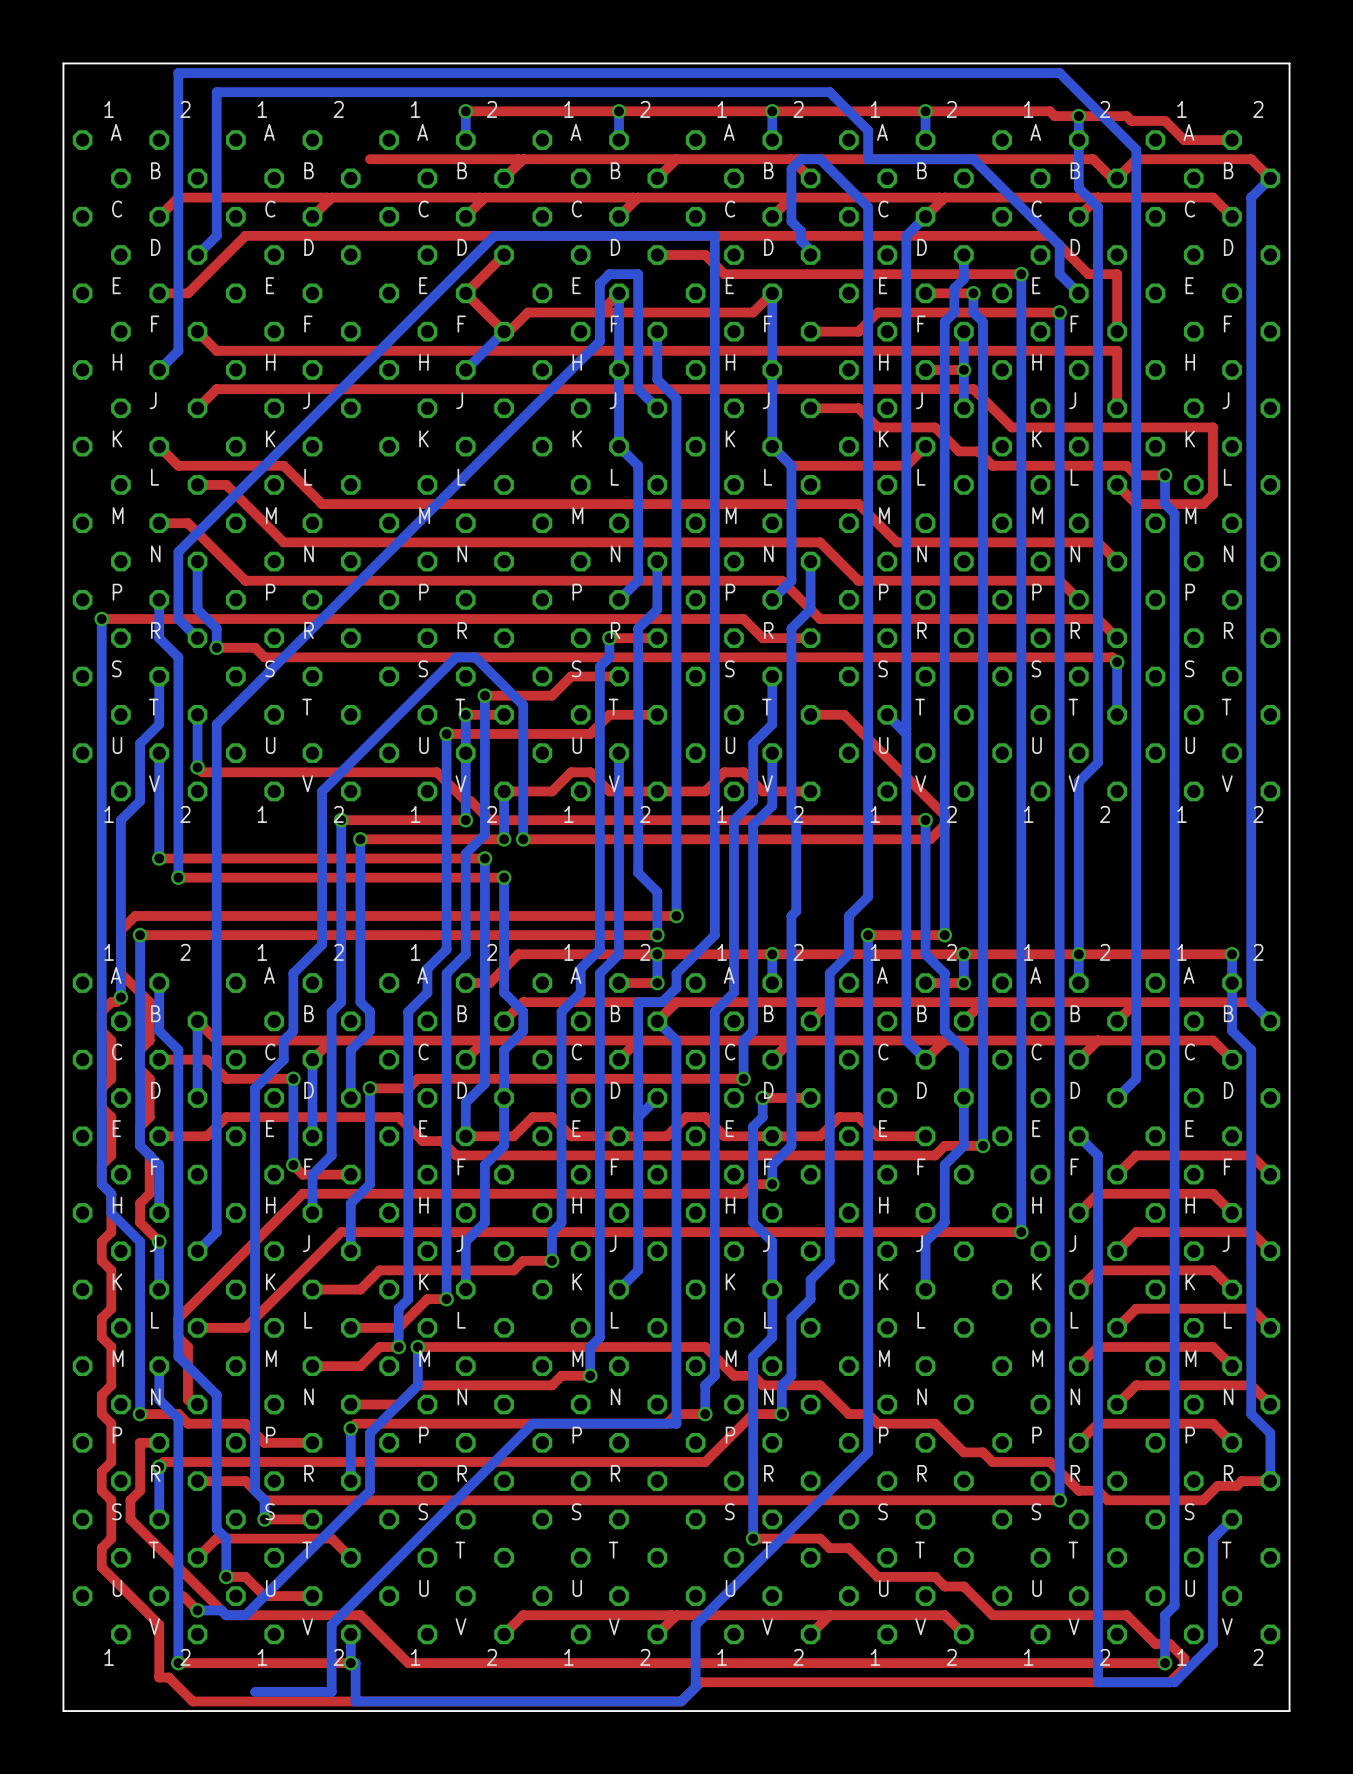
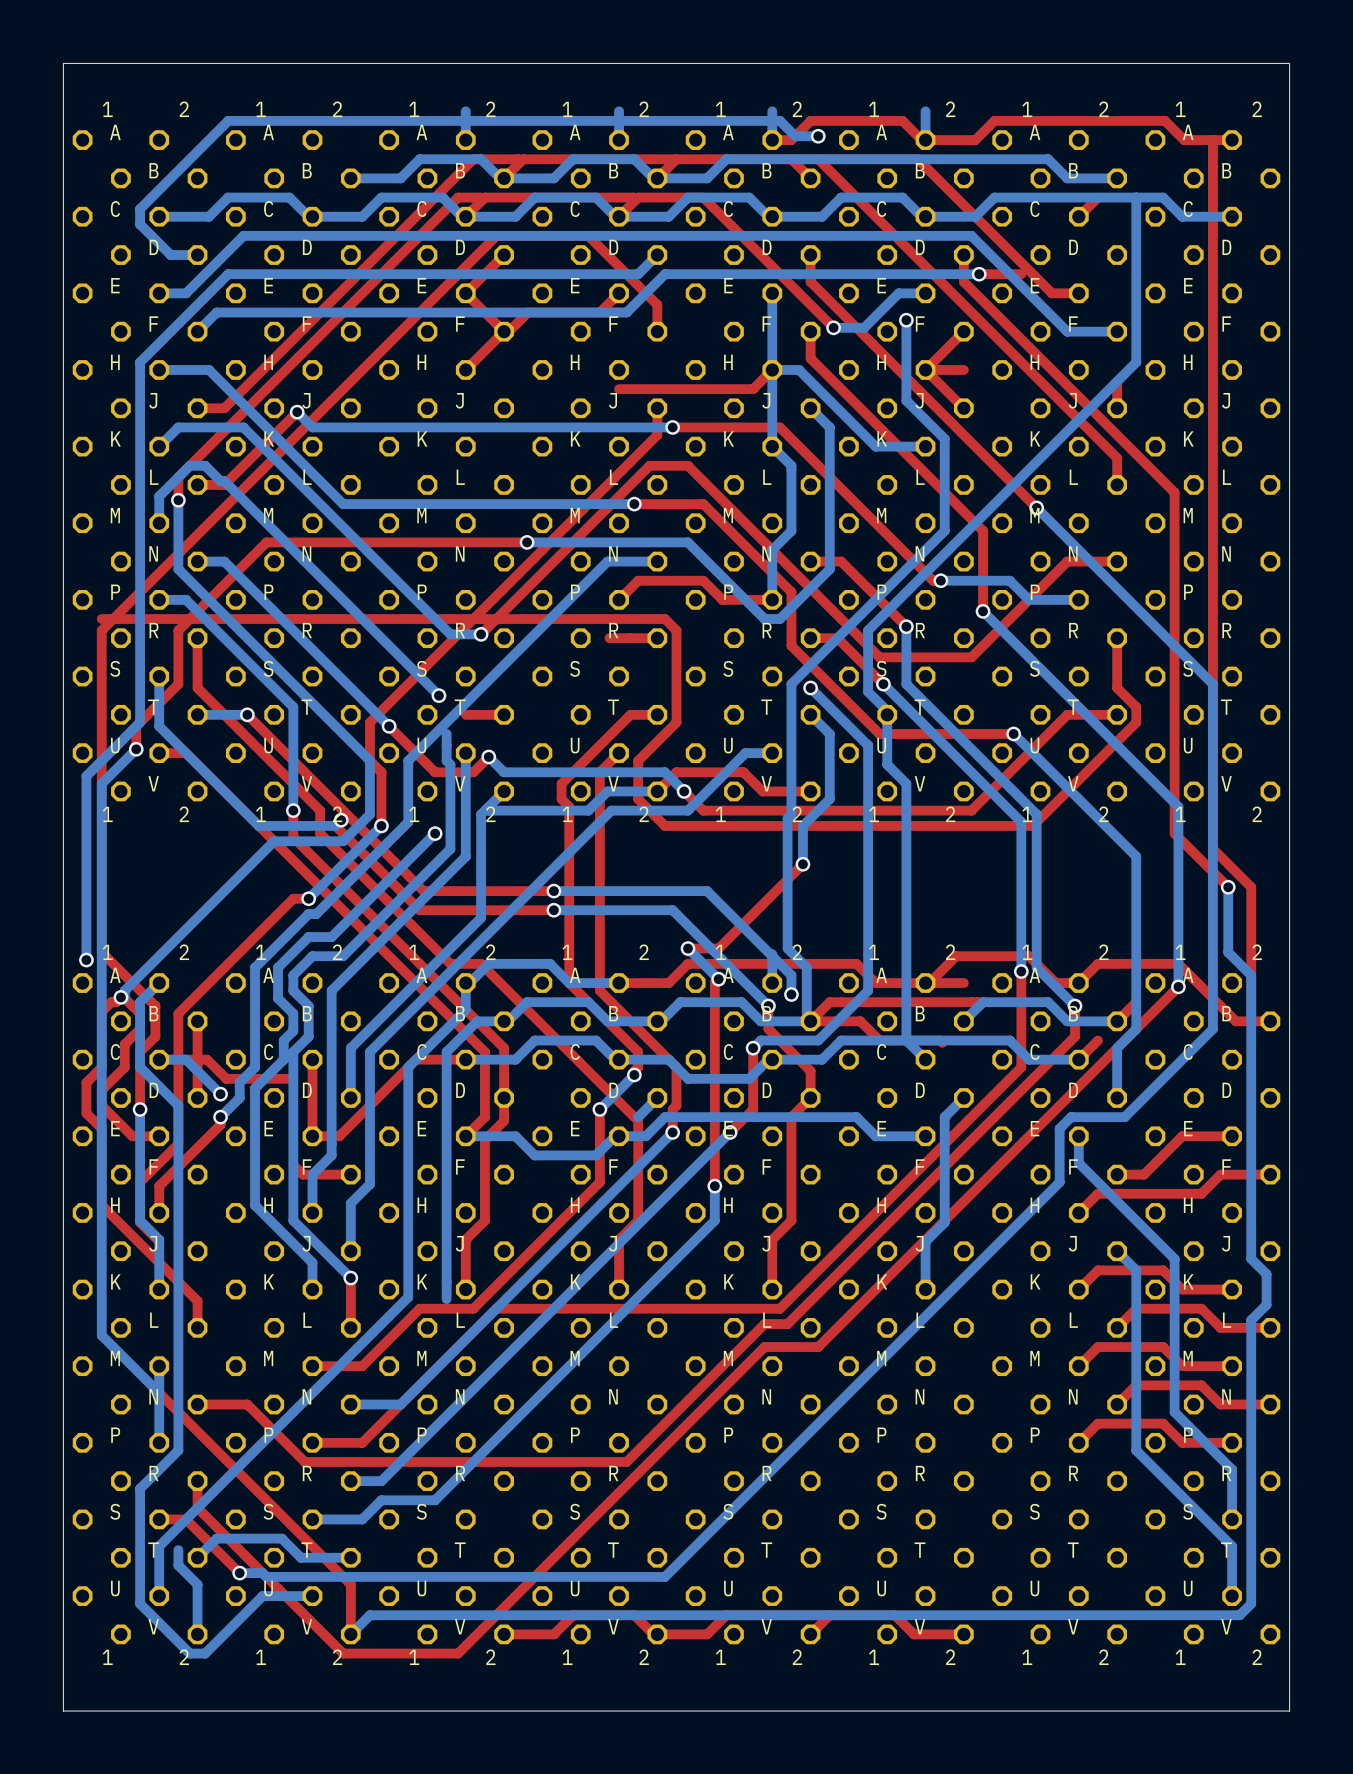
top track: (465, 111) (1050, 111) (1054, 116) (1126, 116) (1131, 120) -> (772, 140) (791, 140) (810, 120) (902, 120) (921, 140) (975, 140) (994, 120) (1131, 120)
via: (465, 111) -> none
via: (619, 111) -> none
via position: (772, 111) -> (818, 136)
via: (925, 111) -> none
bottom track: (1078, 116) (1078, 187) (1097, 207) (1097, 762) (1078, 781) (1078, 983) -> none
via: (1078, 116) -> none
top track: none -> (1212, 140) (1212, 427)
top track: (473, 159) (369, 159) -> none
bottom track: (801, 159) (791, 168) (791, 221) (801, 231) (801, 240) (810, 250) (810, 255) -> (801, 159) (726, 159) (707, 178) (653, 178) (634, 159) (573, 159) (553, 178) (500, 178) (481, 159) (419, 159) (400, 178) (350, 178)
bottom track: (820, 159) (868, 207) (868, 630) -> (820, 159) (868, 159)
bottom track: (868, 159) (868, 130) (829, 92) (216, 92) (216, 235) (197, 255) -> (818, 136) (795, 136) (779, 120) (228, 120) (140, 209) (140, 224) (170, 255) (197, 255)
top track: (917, 159) (1093, 159) (1112, 178) (1117, 178) (1136, 159) (1251, 159) (1270, 178) -> (917, 159) (1052, 293) (1078, 293)
bottom track: (973, 159) (1059, 245) (1059, 274) (1078, 293) -> (973, 159) (1048, 159) (1067, 178) (1117, 178)
bottom track: (1270, 178) (1251, 197) (1251, 975) -> (1228, 887) (1228, 952) (1251, 975)
top track: (458, 197) (331, 197) (312, 216) -> (458, 197) (178, 477) (178, 500)
top track: (703, 197) (786, 197) (789, 199) -> (703, 197) (833, 327)
bottom track: (1136, 197) (1136, 149) (1059, 73) (178, 73) (178, 350) (159, 369) -> (634, 504) (343, 504) (209, 369) (159, 369)
top track: (329, 199) (326, 197) (178, 197) (159, 216) -> none
top track: (942, 199) (939, 197) (791, 197) (772, 216) -> none
bottom track: (925, 216) (906, 235) (906, 320) -> none
top track: (1232, 216) (1212, 197) (944, 197) (925, 216) -> none
bottom track: none -> (1232, 216) (1182, 216) (1163, 197) (994, 197) (975, 216) (921, 216) (902, 197) (841, 197) (822, 216) (768, 216) (749, 197) (688, 197) (668, 216) (615, 216) (596, 197) (534, 197) (515, 216) (461, 216) (442, 197) (381, 197) (362, 216) (308, 216) (289, 197) (228, 197) (209, 216) (159, 216)
bottom track: (494, 235) (178, 551) -> (494, 235) (243, 235) (186, 293) (159, 293)
top track: (496, 235) (245, 235) (187, 293) (159, 293) -> none
top track: (588, 235) (1050, 235) (1088, 274) (1117, 274) (1117, 331) -> (588, 235) (657, 304) (657, 331)
bottom track: (714, 235) (714, 935) (676, 973) (676, 987) (662, 1002) (638, 1002) (638, 1270) (619, 1289) -> (714, 235) (971, 235) (1067, 331) (1117, 331)
top track: (657, 255) (705, 255) (724, 274) (979, 274) -> none
top track: none -> (810, 255) (810, 281) (1036, 507)
top track: none -> (963, 255) (963, 281) (1174, 492) (1174, 833) (1228, 887)
bottom track: (963, 255) (963, 278) (954, 288) (954, 312) (944, 322) (944, 438) -> (906, 400) (944, 438)
bottom track: (609, 274) (599, 283) (599, 341) (216, 724) (216, 1232) (197, 1251) -> (609, 274) (228, 274) (140, 362) (140, 722) (86, 776) (86, 960)
bottom track: (638, 274) (638, 389) (657, 408) -> (638, 274) (657, 255)
bottom track: none -> (979, 274) (665, 274) (626, 312) (216, 312) (197, 331)
bottom track: (1021, 274) (1021, 822) -> (883, 684) (1021, 822)
via: (1021, 274) -> none
bottom track: (619, 293) (619, 446) (638, 465) (638, 580) (619, 599) -> none
top track: (772, 293) (753, 312) (619, 312) -> none
bottom track: none -> (925, 293) (898, 293) (864, 327) (833, 327)
top track: (973, 293) (925, 293) -> none
bottom track: (973, 293) (973, 312) (983, 322) (983, 1145) -> none
via position: (973, 293) -> (979, 274)
top track: (1059, 312) (877, 312) (858, 331) (810, 331) -> (983, 611) (983, 530) (810, 358) (810, 331)
bottom track: (1059, 312) (1059, 1128) -> (1036, 507) (1212, 684) (1212, 1029) (1124, 1117) (1071, 1117) (1059, 1128)
via: (1059, 312) -> none
via: none -> (906, 320)
via: none -> (833, 327)
top track: (197, 331) (216, 350) (1117, 350) (1117, 381) -> none
top track: none -> (504, 331) (465, 369)
bottom track: (504, 331) (465, 369) -> none
bottom track: (657, 331) (657, 379) (676, 398) (676, 915) -> none
top track: none -> (963, 331) (925, 369) (963, 408)
bottom track: (963, 331) (963, 408) -> none
bottom track: (1136, 362) (1136, 856) -> (1136, 362) (868, 630)
bottom track: none -> (772, 369) (799, 369) (875, 446) (925, 446)
via: (963, 369) -> none
top track: (619, 389) (216, 389) (197, 408) -> (473, 159) (224, 408) (197, 408)
top track: (753, 389) (973, 389) (1011, 427) (1212, 427) -> (753, 389) (772, 369)
bottom track: (906, 400) (906, 626) -> none
top track: none -> (657, 408) (657, 435) (369, 722) (369, 760) (381, 772) (381, 825)
top track: (810, 408) (858, 408) (877, 427) (935, 427) (959, 451) (978, 451) (992, 465) (1126, 465) (1136, 475) (1165, 475) -> none
bottom track: none -> (810, 408) (829, 427) (829, 569) (779, 619) (764, 619) (688, 542) (527, 542)
bottom track: none -> (297, 412) (312, 427) (672, 427)
via: none -> (297, 412)
via: none -> (672, 427)
top track: (159, 446) (178, 465) (283, 465) (322, 504) (634, 504) -> none
bottom track: none -> (159, 446) (178, 427) (243, 427) (450, 634) (481, 634)
top track: (925, 446) (906, 465) (791, 465) (772, 446) -> none
bottom track: (1165, 475) (1165, 504) (1174, 513) (1174, 1258) -> none
via: (1165, 475) -> none
top track: (224, 484) (283, 542) -> (224, 484) (297, 412)
top track: (1117, 484) (1136, 504) (1203, 504) (1212, 494) -> (1117, 484) (1117, 458) (818, 159)
top track: none -> (1212, 494) (1212, 848) (1251, 887) (1251, 1021)
bottom track: none -> (178, 500) (178, 551)
via: none -> (178, 500)
via: none -> (634, 504)
top track: (703, 504) (858, 504) (896, 542) (1097, 542) (1117, 561) -> (703, 504) (791, 592) (791, 645) (879, 733) (1013, 733)
via: none -> (1036, 507)
top track: (159, 523) (187, 523) (245, 580) (638, 580) -> (619, 599) (638, 580)
bottom track: none -> (159, 523) (159, 496) (189, 465) (205, 465) (220, 481) (224, 481) (438, 695)
bottom track: (791, 530) (791, 580) (772, 599) -> (791, 530) (772, 550) (772, 599)
bottom track: (944, 530) (944, 935) -> none
top track: none -> (283, 542) (266, 542) (178, 630) (178, 684) (136, 726) (136, 749)
top track: (527, 542) (820, 542) (858, 580) (933, 580) -> (672, 427) (779, 427) (933, 580)
via: none -> (527, 542)
bottom track: (197, 561) (197, 609) (216, 628) (216, 647) -> (197, 561) (224, 561) (389, 726)
bottom track: (657, 561) (657, 609) (638, 628) (638, 872) (657, 892) (657, 935) -> (657, 561) (607, 561) (408, 760) (408, 822) (316, 914) (308, 914) (255, 967) (255, 1067) (239, 1082) (239, 1097) (220, 1117)
top track: none -> (810, 561) (841, 561) (906, 626)
bottom track: (810, 561) (810, 609) (791, 628) (791, 684) -> (944, 530) (791, 684)
bottom track: (178, 569) (178, 619) (197, 638) -> (178, 569) (369, 760) (369, 814) (343, 841) (274, 841) (124, 990) (124, 998)
top track: (703, 580) (781, 580) (820, 619) (1097, 619) (1117, 638) -> (665, 619) (676, 630) (676, 722) (638, 760) (638, 799) (665, 825) (1032, 825) (1136, 722) (1136, 707) (1117, 688) (1117, 638)
top track: none -> (703, 580) (722, 599) (772, 599)
top track: (940, 580) (1059, 580) (1078, 599) -> none
bottom track: none -> (940, 580) (1009, 580) (1029, 599) (1078, 599)
via: none -> (940, 580)
bottom track: (159, 599) (159, 638) (178, 657) (178, 877) -> (159, 599) (186, 599) (293, 707) (293, 810)
bottom track: none -> (983, 611) (1178, 806) (1178, 986)
via: none -> (983, 611)
bottom track: (101, 619) (101, 783) -> (136, 749) (101, 783)
via: (101, 619) -> none
top track: (665, 619) (743, 619) (762, 638) (810, 638) -> (883, 684) (837, 638) (810, 638)
via: none -> (906, 626)
via: none -> (481, 634)
top track: none -> (197, 638) (197, 688) (320, 810) (320, 833) (450, 963) (481, 963) (634, 1117) (638, 1117) (638, 1220) (619, 1239) (619, 1289)
bottom track: (609, 638) (609, 657) (599, 666) (599, 949) (580, 968) (580, 992) (561, 1011) (561, 1222) (551, 1232) (551, 1260) -> none
via: (609, 638) -> none
top track: (216, 647) (255, 647) (264, 657) (879, 657) -> (481, 634) (649, 465) (688, 465) (879, 657)
via: (216, 647) -> none
top track: (971, 657) (1112, 657) (1117, 662) -> (971, 657) (1067, 561) (1117, 561)
bottom track: (1117, 662) (1117, 714) -> none
via: (1117, 662) -> none
top track: (619, 676) (571, 676) (551, 695) (484, 695) -> none
bottom track: (772, 676) (772, 724) (753, 743) (753, 801) (733, 820) (733, 992) (714, 1011) (714, 1186) -> none
via: none -> (883, 684)
bottom track: (906, 684) (906, 729) (904, 731) -> (906, 684) (1036, 814) (1036, 967) (1074, 1006)
via: none -> (810, 688)
bottom track: (868, 691) (868, 745) -> (810, 688) (868, 745)
via: none -> (438, 695)
bottom track: (484, 695) (484, 834) (465, 853) -> (465, 820) (465, 853)
via: (484, 695) -> none
bottom track: (197, 714) (197, 767) -> (197, 714) (247, 714)
top track: none -> (247, 714) (423, 891) (553, 891)
via: none -> (247, 714)
bottom track: (465, 714) (465, 753) -> none
via: (465, 714) -> none
top track: (630, 714) (609, 714) (590, 733) (446, 733) -> (630, 714) (561, 783) (561, 799) (569, 806) (569, 983) (638, 1052) (638, 1067) (634, 1071) (634, 1074)
top track: (810, 714) (844, 714) (944, 815) (944, 824) (930, 839) (523, 839) -> none
bottom track: none -> (810, 714) (829, 733) (829, 799) (802, 825) (802, 864)
bottom track: (887, 714) (906, 733) (906, 783) -> (868, 691) (887, 710) (887, 764) (906, 783)
top track: none -> (1117, 714) (1067, 714) (971, 810) (703, 810) (684, 791)
bottom track: (159, 724) (140, 743) (140, 801) (120, 820) (120, 997) -> (159, 724) (258, 825) (335, 825)
via: none -> (389, 726)
via: (446, 733) -> none
bottom track: none -> (1013, 733) (1136, 856)
via: none -> (1013, 733)
via: none -> (136, 749)
bottom track: (159, 753) (159, 858) -> none
top track: none -> (619, 753) (599, 772) (599, 990) (676, 1067) (676, 1105) (672, 1109) (672, 1132)
bottom track: (619, 753) (619, 954) (599, 973) (599, 1337) (590, 1347) (590, 1375) -> none
bottom track: (772, 753) (772, 805) (753, 824) (753, 1030) (743, 1040) (743, 1078) -> (772, 753) (745, 753) (688, 810) (611, 810) (369, 1052) (369, 1088)
bottom track: none -> (488, 756) (504, 772) (665, 772) (684, 791)
via: none -> (488, 756)
bottom track: (446, 760) (446, 949) (427, 968) (427, 992) (408, 1011) (408, 1067) -> (619, 983) (569, 983) (550, 963) (488, 963) (469, 983) (465, 983) (465, 1009) (408, 1067)
top track: (197, 767) (202, 772) (435, 772) -> (389, 726) (435, 772)
via: (197, 767) -> none
top track: (437, 772) (465, 801) (470, 801) (489, 820) (925, 820) -> (437, 772) (473, 772) (488, 756)
top track: (724, 772) (705, 791) (609, 791) (590, 772) (571, 772) (551, 791) (504, 791) -> (724, 772) (676, 772) (657, 791)
bottom track: (504, 791) (504, 839) -> none
bottom track: none -> (657, 791) (607, 791) (588, 810) (488, 810) (486, 808)
via: none -> (684, 791)
top track: none -> (293, 810) (293, 837) (504, 1048) (504, 1120) (484, 1140) (484, 1220) (465, 1239) (465, 1289)
via: none -> (293, 810)
bottom track: (791, 814) (796, 820) (796, 911) (791, 915) (791, 975) -> (553, 891) (707, 891) (791, 975)
bottom track: none -> (791, 814) (787, 818) (787, 948) (806, 967) (806, 1017) (810, 1021) (760, 1021) (741, 1002) (680, 1002) (661, 1021) (607, 1021) (588, 1002) (527, 1002) (507, 1021) (477, 1021) (446, 1052)
bottom track: (341, 820) (341, 1002) (331, 1011) -> none
top track: (465, 820) (341, 820) -> none
via: (465, 820) -> none
bottom track: (925, 820) (925, 954) (944, 973) (944, 1030) (963, 1050) (963, 1145) (944, 1165) -> (963, 1097) (944, 1117) (944, 1165)
via: (925, 820) -> none
top track: none -> (335, 825) (419, 910) (553, 910)
bottom track: none -> (381, 825) (308, 898)
bottom track: none -> (435, 833) (331, 937) (308, 937) (278, 967) (278, 998) (293, 1013)
via: none -> (435, 833)
bottom track: (360, 839) (360, 1002) (369, 1011) (369, 1030) (350, 1050) -> (504, 791) (481, 814) (481, 917) (350, 1050)
via position: (360, 839) -> (381, 825)
top track: (504, 839) (360, 839) -> none
via: (504, 839) -> none
bottom track: (523, 839) (523, 705) (475, 657) (456, 657) (322, 791) (322, 944) (293, 975) -> (446, 760) (450, 764) (450, 848) (343, 956) (312, 956) (293, 975)
via: (523, 839) -> none
bottom track: (465, 856) (465, 954) (446, 973) (446, 1052) -> (465, 856) (331, 990) (331, 1011)
via: (159, 858) -> none
top track: (484, 858) (159, 858) -> none
bottom track: (484, 858) (484, 1083) (465, 1102) (465, 1136) -> (925, 1136) (875, 1136) (856, 1117) (665, 1117) (645, 1136) (615, 1136) (596, 1155) (534, 1155) (515, 1136) (465, 1136)
via: (484, 858) -> none
top track: none -> (802, 864) (718, 948) (688, 948)
via: none -> (802, 864)
via: (178, 877) -> none
top track: (504, 877) (178, 877) -> none
bottom track: (504, 877) (504, 992) (523, 1011) (523, 1030) (504, 1050) (504, 1145) (484, 1165) (484, 1222) (465, 1241) (465, 1289) -> none
via: (504, 877) -> none
via: none -> (1228, 887)
via: none -> (553, 891)
bottom track: (868, 896) (848, 915) (848, 954) (829, 973) (829, 1260) (810, 1279) (810, 1299) (791, 1318) (791, 1375) (781, 1385) (781, 1414) -> (868, 896) (868, 935)
top track: none -> (308, 898) (293, 898) (178, 1013) (178, 1143) (140, 1182) (140, 1203)
via: none -> (308, 898)
bottom track: none -> (553, 910) (672, 910) (768, 1006)
via: none -> (553, 910)
top track: (676, 915) (135, 915) (120, 930) (120, 973) (149, 1002) (149, 1040) (140, 1052) -> (496, 235) (101, 630) (101, 952) (155, 1006) (155, 1036) (140, 1052)
via: (676, 915) -> none
bottom track: (140, 935) (140, 1002) -> (159, 983) (140, 1002)
via position: (140, 935) -> (86, 960)
top track: (657, 935) (140, 935) -> none
via: (657, 935) -> none
via: (868, 935) -> none
top track: (944, 935) (868, 935) -> none
via: (944, 935) -> none
bottom track: none -> (688, 948) (718, 979)
via: none -> (688, 948)
bottom track: (657, 954) (657, 983) -> none
via: (657, 954) -> none
via: (772, 954) -> none
bottom track: (963, 954) (963, 983) -> none
via: (963, 954) -> none
via: (1078, 954) -> none
top track: (1232, 954) (518, 954) (489, 983) (465, 983) -> none
bottom track: (1232, 954) (1232, 1030) (1251, 1050) -> none
via: (1232, 954) -> none
bottom track: (1021, 971) (1021, 1232) -> none
via: none -> (1021, 971)
top track: none -> (718, 979) (714, 983) (714, 1186)
via: none -> (718, 979)
bottom track: (159, 983) (159, 1030) (178, 1050) (178, 1105) -> none
via: (657, 983) -> none
top track: none -> (925, 983) (875, 983) (856, 963) (688, 963) (668, 983) (657, 983)
via: (963, 983) -> none
via: none -> (1178, 986)
bottom track: (293, 990) (293, 1013) -> (293, 990) (308, 1006) (308, 1036) (293, 1052) (293, 1078)
bottom track: (868, 990) (868, 1452) (695, 1624) (695, 1687) (681, 1701) (355, 1701) (355, 1663) (350, 1663) (350, 1634) -> (1251, 1414) (1251, 1603) (1239, 1615) (369, 1615) (350, 1634)
bottom track: none -> (868, 990) (818, 1040) (760, 1040) (753, 1048)
bottom track: (791, 994) (791, 1145) (772, 1165) (772, 1184) -> none
via: none -> (791, 994)
bottom track: (1251, 1002) (1270, 1021) -> (1251, 1002) (1251, 1050)
top track: (674, 1004) (671, 1002) (523, 1002) (504, 1021) -> none
top track: (827, 1004) (824, 1002) (676, 1002) (657, 1021) -> none
top track: none -> (768, 1006) (768, 1029) (810, 1071) (810, 1097) (791, 1117) (791, 1220) (772, 1239) (772, 1289)
via: none -> (768, 1006)
via: none -> (1074, 1006)
top track: (197, 1021) (216, 1040) (326, 1040) (329, 1042) -> (197, 1021) (197, 1097)
bottom track: (197, 1021) (197, 1097) -> none
bottom track: (657, 1021) (676, 1040) (676, 1423) (532, 1423) (331, 1624) (331, 1691) (255, 1691) -> none
bottom track: none -> (1117, 1021) (1067, 1021) (1048, 1002) (983, 1002) (963, 1021)
top track: (1270, 1021) (1251, 1002) (983, 1002) (963, 1021) -> (1270, 1021) (1235, 1021) (1178, 963) (1097, 963) (1078, 983) (1055, 983) (1029, 956) (956, 956) (929, 983)
bottom track: (1136, 1029) (1136, 1078) (1117, 1097) -> (1136, 1029) (1117, 1048) (1117, 1097)
top track: (101, 1030) (111, 1040) (111, 1078) (101, 1090) -> (124, 998) (140, 1013) (140, 1029) (124, 1044) (124, 1067) (101, 1090)
top track: none -> (101, 1030) (101, 1067) (86, 1082) (86, 1113) (101, 1128) (101, 1165)
top track: (879, 1040) (791, 1040) (772, 1059) -> (879, 1040) (860, 1021) (810, 1021)
top track: (482, 1042) (480, 1040) (331, 1040) (312, 1059) -> (465, 1059) (415, 1059) (339, 1136) (312, 1136) (312, 1059)
top track: (635, 1042) (633, 1040) (484, 1040) (465, 1059) -> none
top track: (789, 1042) (786, 1040) (638, 1040) (619, 1059) -> none
top track: none -> (753, 1048) (753, 1109) (730, 1132)
via: none -> (753, 1048)
bottom track: none -> (159, 1059) (186, 1059) (220, 1094)
bottom track: (312, 1059) (312, 1136) -> none
bottom track: none -> (1078, 1059) (1029, 1059) (1009, 1040) (841, 1040) (822, 1059) (768, 1059) (749, 1078) (688, 1078) (668, 1059) (615, 1059) (596, 1040) (534, 1040) (515, 1059) (465, 1059)
top track: (1232, 1059) (1212, 1040) (944, 1040) (925, 1059) -> none
bottom track: (140, 1067) (140, 1109) -> (140, 1067) (178, 1105)
top track: (140, 1069) (149, 1078) (149, 1117) (140, 1126) (140, 1145) (149, 1155) (149, 1193) (140, 1203) -> (140, 1069) (140, 1109)
bottom track: none -> (634, 1074) (599, 1109)
via: none -> (634, 1074)
via: (293, 1078) -> none
top track: (743, 1078) (417, 1078) (408, 1088) (369, 1088) -> none
via: (743, 1078) -> none
via: (369, 1088) -> none
via: none -> (220, 1094)
bottom track: (762, 1097) (762, 1117) (753, 1126) (753, 1222) (772, 1241) (772, 1337) (753, 1356) (753, 1538) -> none
via: (762, 1097) -> none
top track: (810, 1097) (762, 1097) -> none
top track: (101, 1105) (111, 1117) (111, 1155) (101, 1165) -> (101, 1105) (132, 1136) (159, 1136)
via: none -> (140, 1109)
via: none -> (599, 1109)
top track: none -> (220, 1117) (220, 1124) (159, 1186) (159, 1212)
via: none -> (220, 1117)
bottom track: none -> (672, 1132) (400, 1404) (350, 1404)
via: none -> (672, 1132)
via: none -> (730, 1132)
top track: (159, 1136) (207, 1136) (226, 1117) (398, 1117) (422, 1141) (441, 1141) (456, 1155) (935, 1155) (944, 1145) (983, 1145) -> none
top track: (925, 1136) (877, 1136) (858, 1117) (839, 1117) (820, 1136) (724, 1136) (705, 1117) (686, 1117) (666, 1136) (571, 1136) (551, 1117) (532, 1117) (513, 1136) (465, 1136) -> (159, 753) (186, 753) (484, 1052) (484, 1117) (465, 1136)
bottom track: (1078, 1136) (1097, 1155) (1097, 1682) (1174, 1682) (1212, 1643) (1212, 1538) (1232, 1519) -> (1078, 1136) (1078, 1163) (1174, 1258)
bottom track: (140, 1145) (159, 1165) (159, 1212) -> (140, 1145) (140, 1220) (159, 1241)
via: (983, 1145) -> none
bottom track: none -> (293, 1165) (293, 1220) (350, 1278)
via: (293, 1165) -> none
top track: (1270, 1174) (1251, 1155) (1136, 1155) (1117, 1174) -> (1232, 1136) (1182, 1136) (1143, 1174) (1117, 1174)
bottom track: (1059, 1182) (1059, 1500) -> (1059, 1182) (665, 1576) (266, 1576) (262, 1573) (239, 1573)
top track: (101, 1184) (111, 1193) (111, 1232) (101, 1241) (101, 1260) (111, 1270) (111, 1308) (101, 1318) (101, 1337) (111, 1347) (111, 1385) (101, 1394) (101, 1414) (111, 1423) (111, 1461) (101, 1471) (101, 1490) (111, 1500) (111, 1538) (101, 1548) (101, 1567) (159, 1624) (159, 1677) (168, 1677) (192, 1701) (681, 1701) (700, 1682) (1169, 1682) (1184, 1667) (1184, 1658) (1169, 1643) (1155, 1643) (1126, 1615) (992, 1615) (963, 1586) (944, 1586) (935, 1576) (877, 1576) (848, 1548) (829, 1548) (820, 1538) (753, 1538) -> (101, 1184) (101, 1205) (197, 1301) (197, 1327)
bottom track: (101, 1184) (111, 1193) (111, 1212) (140, 1241) (140, 1414) -> (101, 1184) (101, 1335) (159, 1393)
top track: (772, 1184) (753, 1184) (743, 1193) (302, 1193) (178, 1318) (178, 1337) (187, 1347) (187, 1399) (192, 1404) (197, 1404) -> none
via: (772, 1184) -> none
via: none -> (714, 1186)
top track: (1201, 1193) (1212, 1193) (1232, 1212) -> (1201, 1193) (1220, 1174) (1270, 1174)
bottom track: (255, 1205) (255, 1490) (264, 1500) (264, 1519) -> (255, 1205) (312, 1262) (312, 1289)
bottom track: (714, 1220) (714, 1375) (705, 1385) (705, 1414) -> (714, 1220) (435, 1500) (381, 1500) (362, 1519) (312, 1519)
top track: (1021, 1232) (341, 1232) (245, 1327) (197, 1327) -> none
via: (1021, 1232) -> none
via: (159, 1241) -> none
bottom track: none -> (1117, 1251) (1136, 1270) (1136, 1450) (1232, 1546) (1232, 1596)
top track: (1270, 1251) (1251, 1232) (1136, 1232) (1117, 1251) -> none
bottom track: (1251, 1258) (1251, 1320) -> (1251, 1258) (1266, 1274) (1266, 1304) (1251, 1320)
top track: (551, 1260) (523, 1260) (513, 1270) (379, 1270) (360, 1289) (312, 1289) -> none
via: (551, 1260) -> none
top track: (1163, 1270) (1212, 1270) (1232, 1289) -> (1163, 1270) (1182, 1289) (1232, 1289)
via: none -> (350, 1278)
bottom track: (408, 1297) (398, 1308) (398, 1347) -> (408, 1297) (159, 1546) (159, 1596)
top track: (446, 1299) (427, 1299) (398, 1327) (350, 1327) -> (350, 1278) (350, 1327)
via: (446, 1299) -> none
top track: (1201, 1308) (1251, 1308) (1270, 1327) -> (1201, 1308) (1220, 1327) (1270, 1327)
top track: (398, 1347) (379, 1347) (360, 1366) -> (599, 1109) (599, 1182) (473, 1308) (419, 1308) (360, 1366)
via: (398, 1347) -> none
top track: (417, 1347) (705, 1347) (733, 1375) (753, 1375) (762, 1385) (820, 1385) (848, 1414) (868, 1414) (877, 1423) (935, 1423) (963, 1452) (983, 1452) (992, 1461) (1050, 1461) (1078, 1490) (1097, 1490) (1107, 1500) (1203, 1500) (1217, 1485) (1236, 1485) (1241, 1481) (1270, 1481) -> none
bottom track: (417, 1347) (417, 1385) (369, 1433) (369, 1490) (245, 1615) (226, 1615) (221, 1610) (197, 1610) -> none
via: (417, 1347) -> none
top track: (1163, 1347) (1212, 1347) (1232, 1366) -> (1163, 1347) (1182, 1366) (1232, 1366)
bottom track: (178, 1356) (216, 1394) (216, 1529) (226, 1538) (226, 1576) -> (178, 1356) (178, 1418)
top track: none -> (159, 1366) (159, 1393) (350, 1584) (350, 1634)
top track: (590, 1375) (561, 1375) (551, 1385) (417, 1385) (398, 1404) (350, 1404) -> none
via: (590, 1375) -> none
top track: (1201, 1385) (1251, 1385) (1270, 1404) -> (1201, 1385) (1220, 1404) (1270, 1404)
bottom track: (159, 1399) (178, 1418) -> (159, 1399) (159, 1442)
bottom track: (1174, 1412) (1174, 1605) (1165, 1615) (1165, 1663) -> (1174, 1412) (1232, 1469) (1232, 1519)
top track: (140, 1414) (178, 1414) (187, 1423) (245, 1423) (264, 1442) (312, 1442) -> (1021, 971) (1021, 1067) (779, 1308) (496, 1308) (362, 1442) (312, 1442)
via: (140, 1414) -> none
top track: (705, 1414) (676, 1414) (666, 1423) (355, 1423) (350, 1428) -> none
via: (705, 1414) -> none
top track: (781, 1414) (753, 1414) (705, 1461) (626, 1461) -> (1074, 1006) (1074, 1036) (787, 1324) (764, 1324) (626, 1461)
via: (781, 1414) -> none
bottom track: (1251, 1414) (1270, 1433) (1270, 1481) -> none
top track: (1163, 1423) (1212, 1423) (1232, 1442) -> (1163, 1423) (1182, 1442) (1232, 1442)
bottom track: (350, 1428) (350, 1481) -> (730, 1132) (381, 1481) (350, 1481)
via: (350, 1428) -> none
top track: (159, 1442) (140, 1442) (140, 1490) (130, 1500) (130, 1519) (226, 1615) (360, 1615) (408, 1663) (1165, 1663) -> none
bottom track: (178, 1450) (178, 1550) -> (178, 1450) (140, 1488) (140, 1603) (189, 1653) (205, 1653) (262, 1596) (312, 1596)
top track: (304, 1461) (164, 1461) (159, 1466) -> (304, 1461) (247, 1404) (197, 1404)
bottom track: (159, 1466) (159, 1519) -> none
via: (159, 1466) -> none
top track: (197, 1481) (245, 1481) (264, 1500) (1059, 1500) -> (197, 1481) (197, 1507) (343, 1653) (458, 1653) (764, 1347) (818, 1347) (1178, 986)
via: (1059, 1500) -> none
top track: none -> (159, 1519) (186, 1519) (239, 1573)
via: (264, 1519) -> none
top track: (312, 1519) (264, 1519) -> none
via: (753, 1538) -> none
top track: (350, 1557) (331, 1538) (216, 1538) (197, 1557) -> none
bottom track: none -> (350, 1557) (301, 1557) (281, 1538) (216, 1538) (197, 1557)
bottom track: (178, 1565) (178, 1663) -> (178, 1565) (197, 1584) (197, 1634)
top track: (226, 1576) (245, 1576) (264, 1596) (312, 1596) -> none
via position: (226, 1576) -> (239, 1573)
top track: (183, 1596) (197, 1610) -> none
via: (197, 1610) -> none
top track: (573, 1615) (523, 1615) (504, 1634) -> (573, 1615) (553, 1634) (504, 1634)
top track: (634, 1615) (671, 1615) (674, 1617) -> none
top track: (726, 1615) (676, 1615) (657, 1634) -> (726, 1615) (707, 1634) (653, 1634) (634, 1615)
top track: (894, 1615) (944, 1615) (963, 1634) -> (894, 1615) (914, 1634) (963, 1634)
via: (178, 1663) -> none
top track: (350, 1663) (178, 1663) -> none
via: (350, 1663) -> none
via: (1165, 1663) -> none

